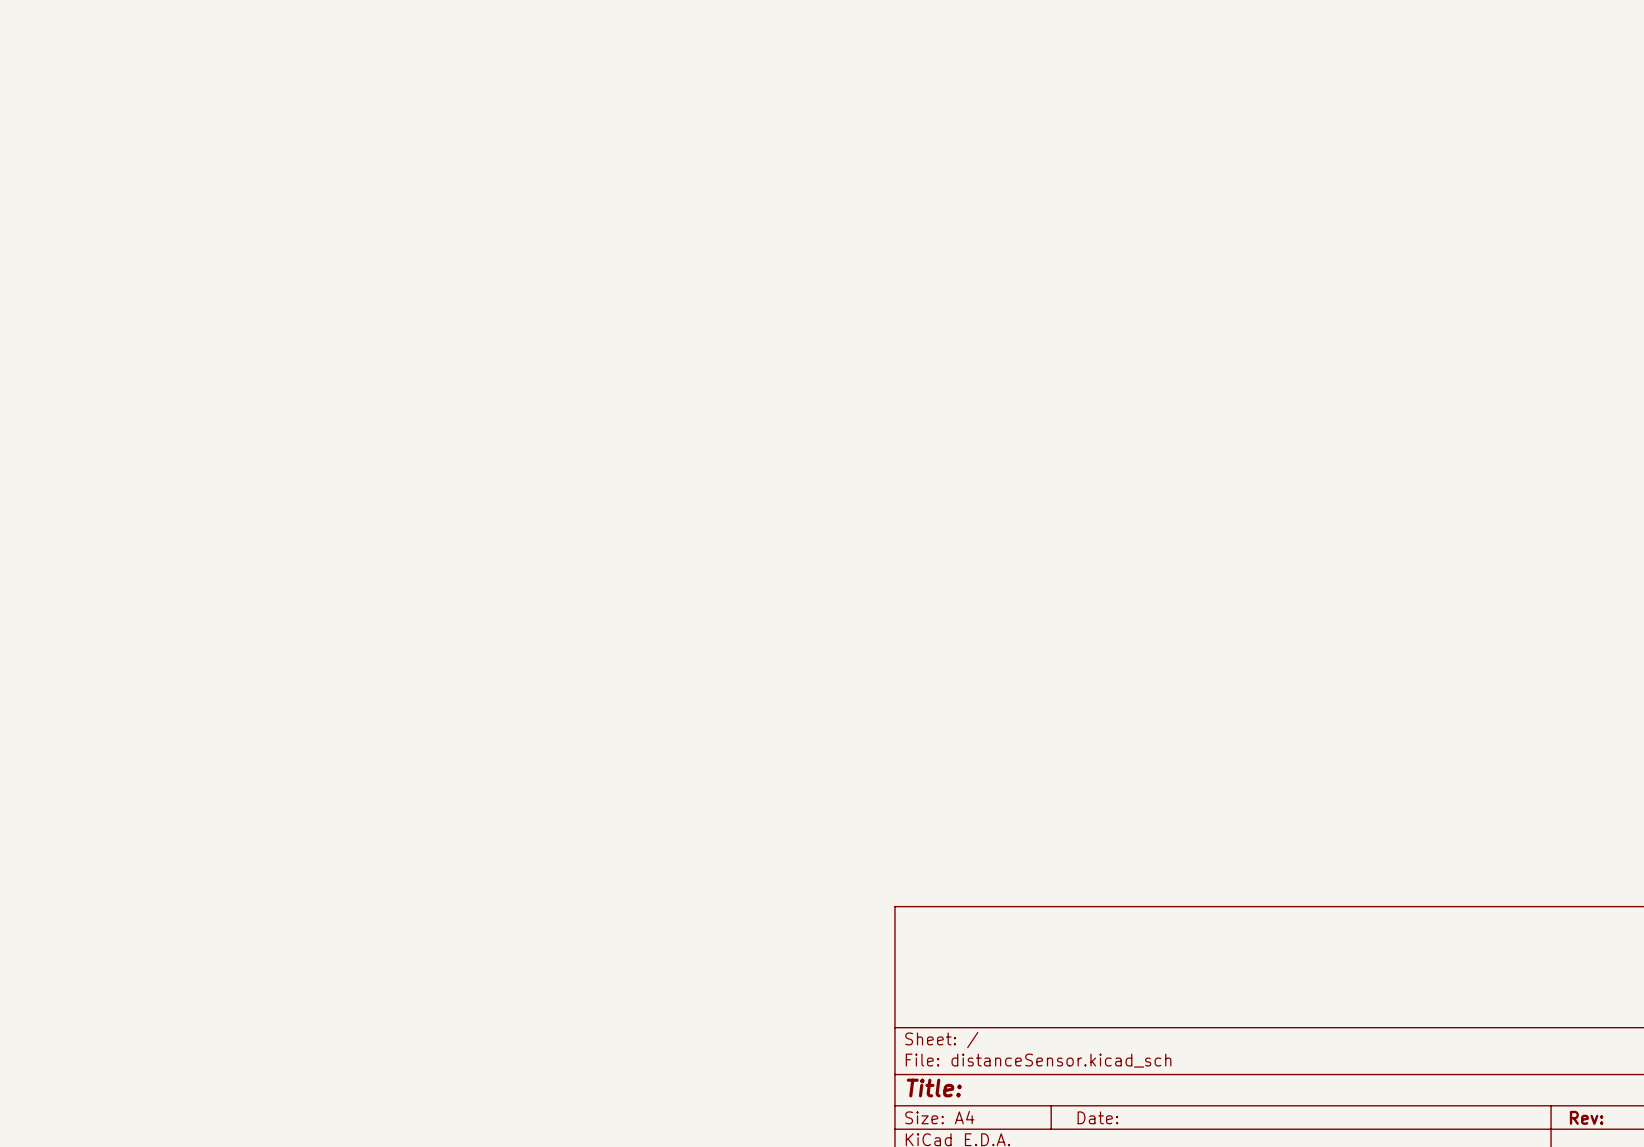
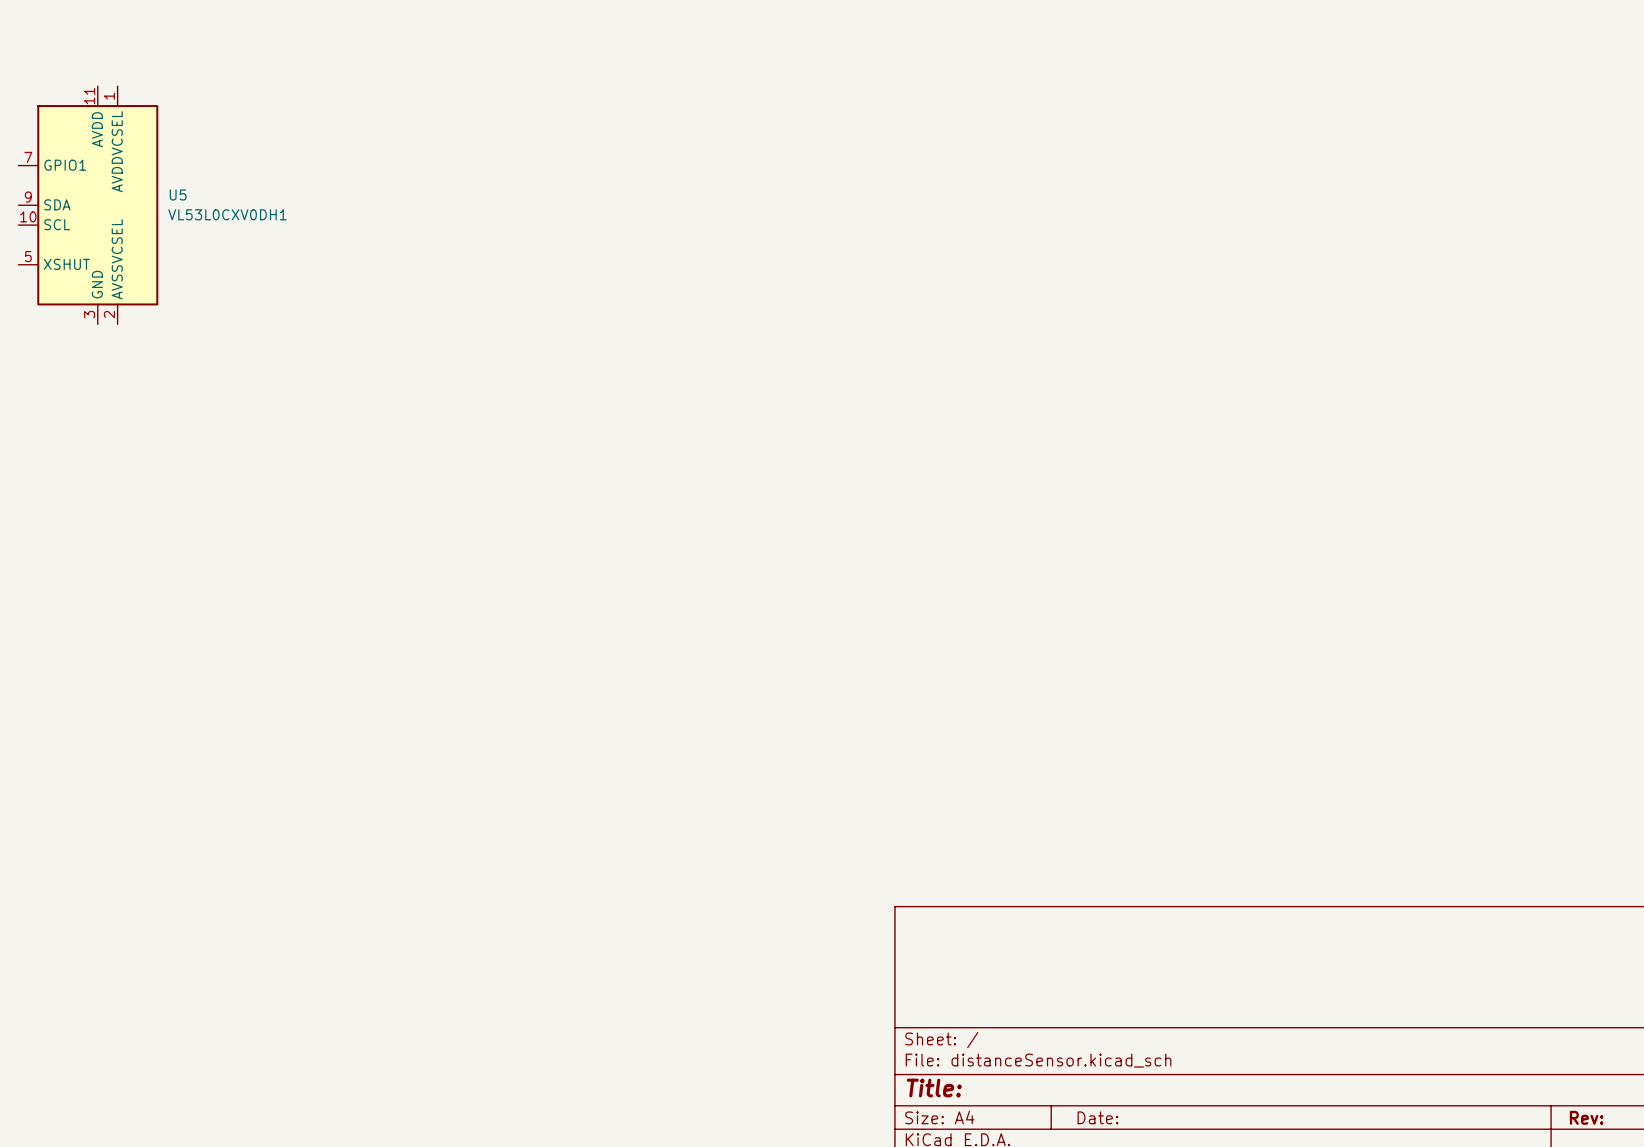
U5: none -> VL53L0CXV0DH1 (88, 205)

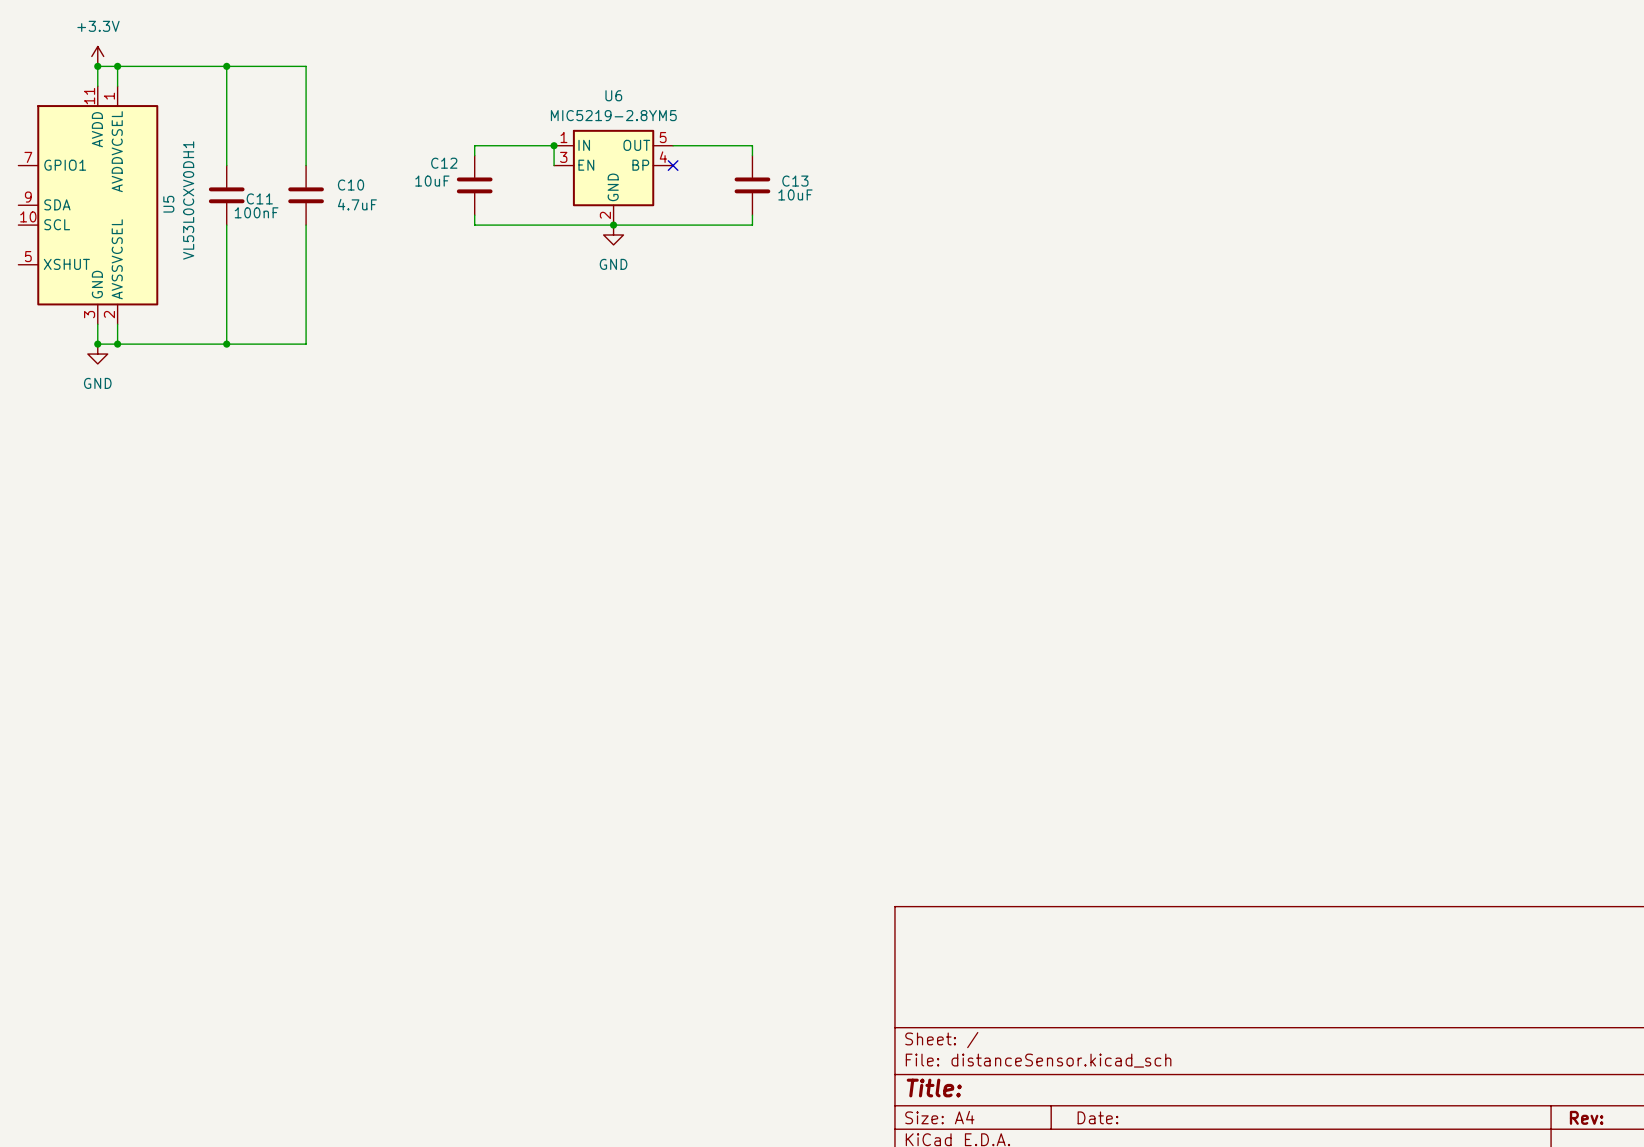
power symbol: none -> +3.3V (97, 56)
junction: none -> (97, 66)
wire: none -> (117, 66) (117, 86)
junction: none -> (117, 66)
wire: none -> (226, 66) (226, 165)
junction: none -> (226, 66)
wire: none -> (97, 86) (97, 66) (306, 66) (306, 165)
junction: none -> (554, 145)
wire: none -> (673, 145) (752, 145) (752, 155)
wire: none -> (474, 155) (474, 145) (554, 145) (554, 165)
no-connect mark: none -> (673, 165)
U6: none -> MIC5219-2.8YM5 (613, 177)
C12: none -> 10uF (474, 185)
C13: none -> 10uF (752, 185)
U5 name rotation: 0° (178, 194) -> 90° counterclockwise (168, 204)
C11: none -> 100nF (226, 195)
C10: none -> 4.7uF (306, 195)
U5 value rotation: 0° (227, 214) -> 90° counterclockwise (188, 200)
wire: none -> (474, 215) (474, 225) (752, 225) (752, 215)
wire: none -> (226, 225) (226, 344)
wire: none -> (306, 225) (306, 344) (97, 344) (97, 324)
junction: none -> (613, 225)
power symbol: none -> GND (613, 235)
wire: none -> (117, 324) (117, 344)
junction: none -> (97, 344)
junction: none -> (117, 344)
junction: none -> (226, 344)
power symbol: none -> GND (97, 354)

